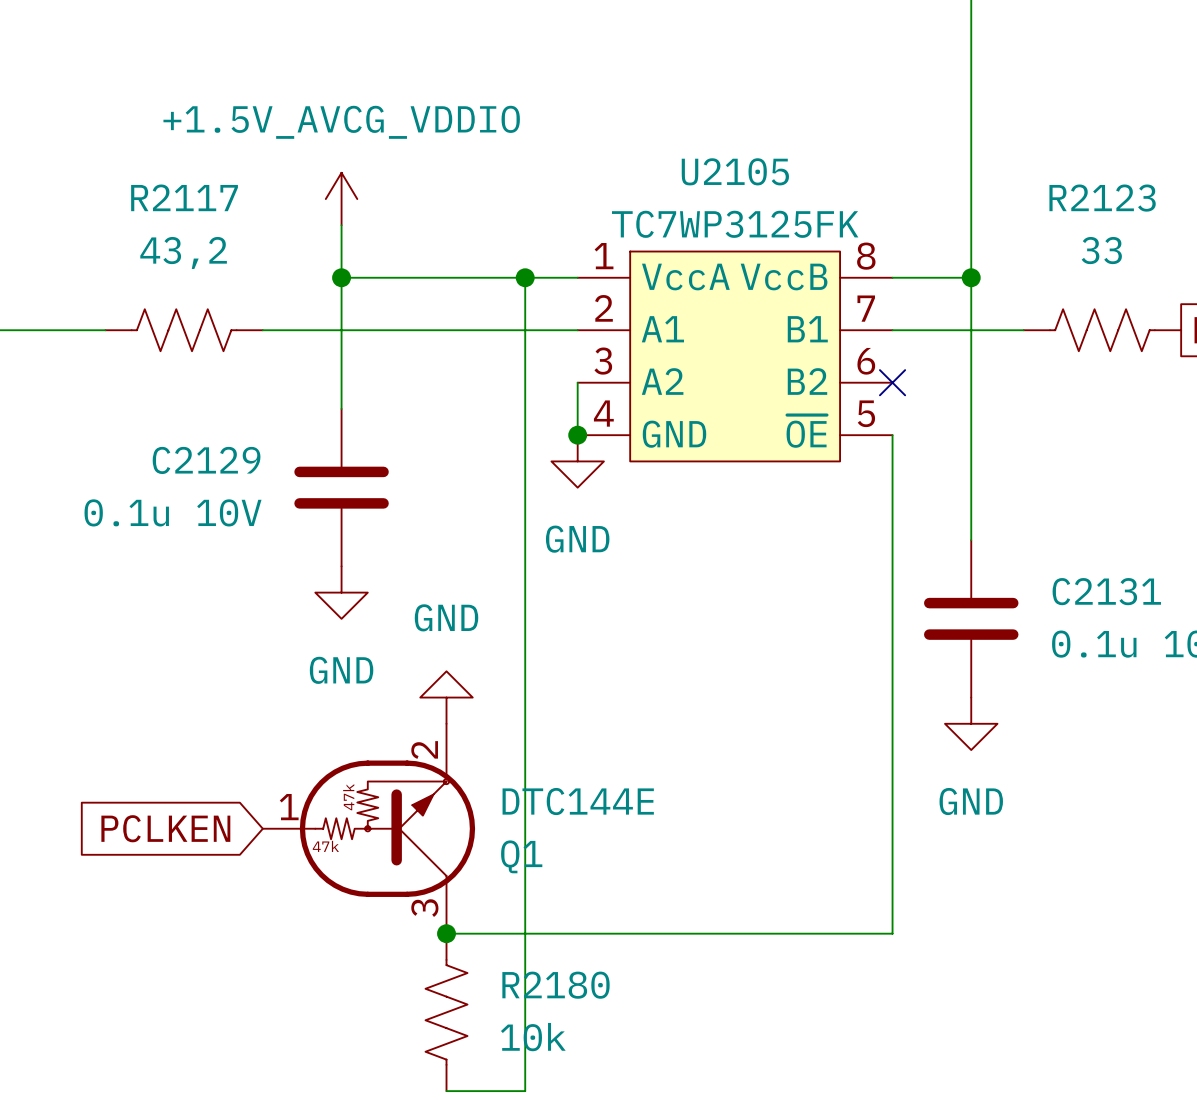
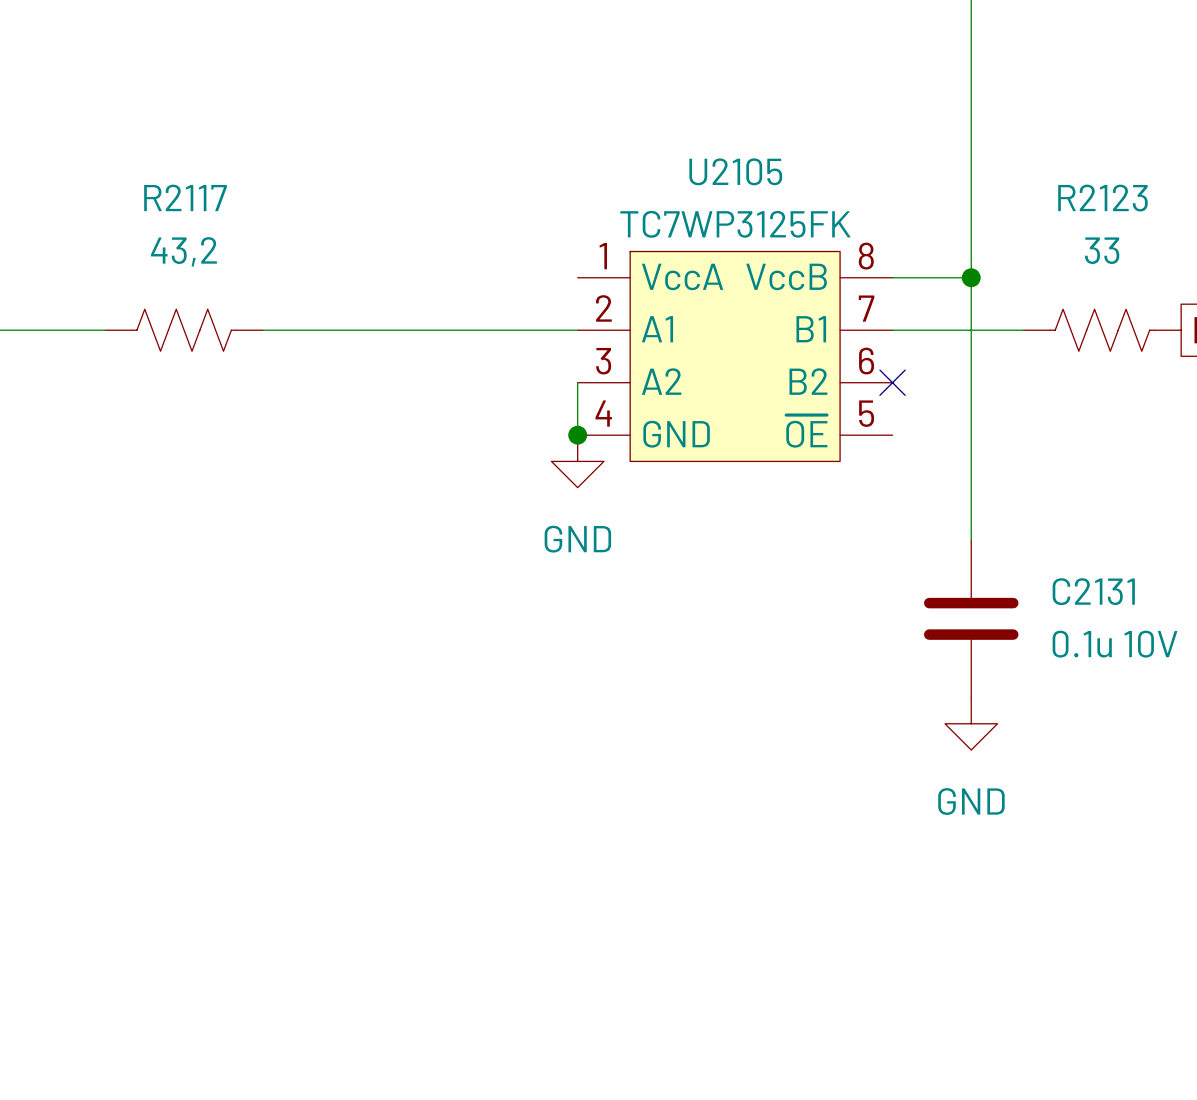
power symbol: +1.5V_AVCG_VDDIO (341, 199) -> none
wire: (341, 225) (341, 408) -> none
wire: (341, 277) (577, 277) -> none
junction: (341, 277) -> none
wire: (525, 277) (525, 1091) (446, 1091) -> none
junction: (525, 277) -> none
wire: (892, 435) (892, 933) (446, 933) -> none
C2129: 0.1u 10V (341, 487) -> none
power symbol: GND (341, 592) -> none
power symbol: GND (446, 697) -> none
global label: PCLKEN (165, 828) -> none
Q1: DTC144E (368, 828) -> none
junction: (446, 933) -> none
R2180: 10k (446, 1012) -> none

